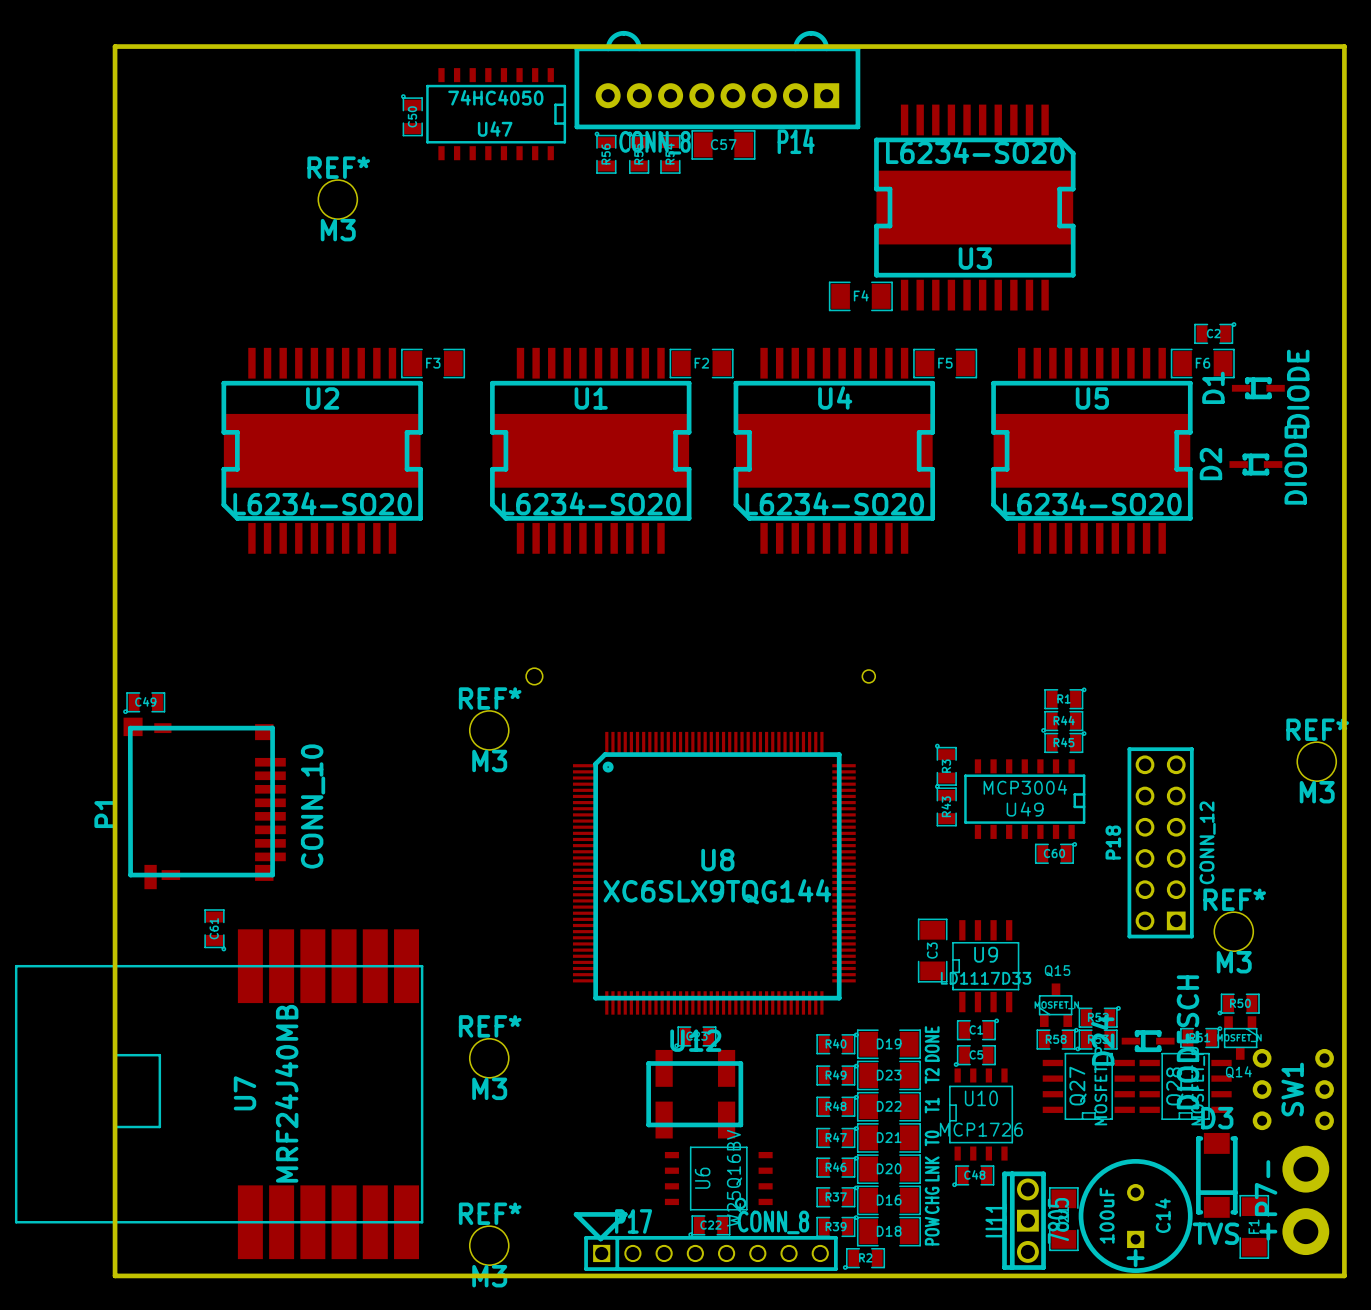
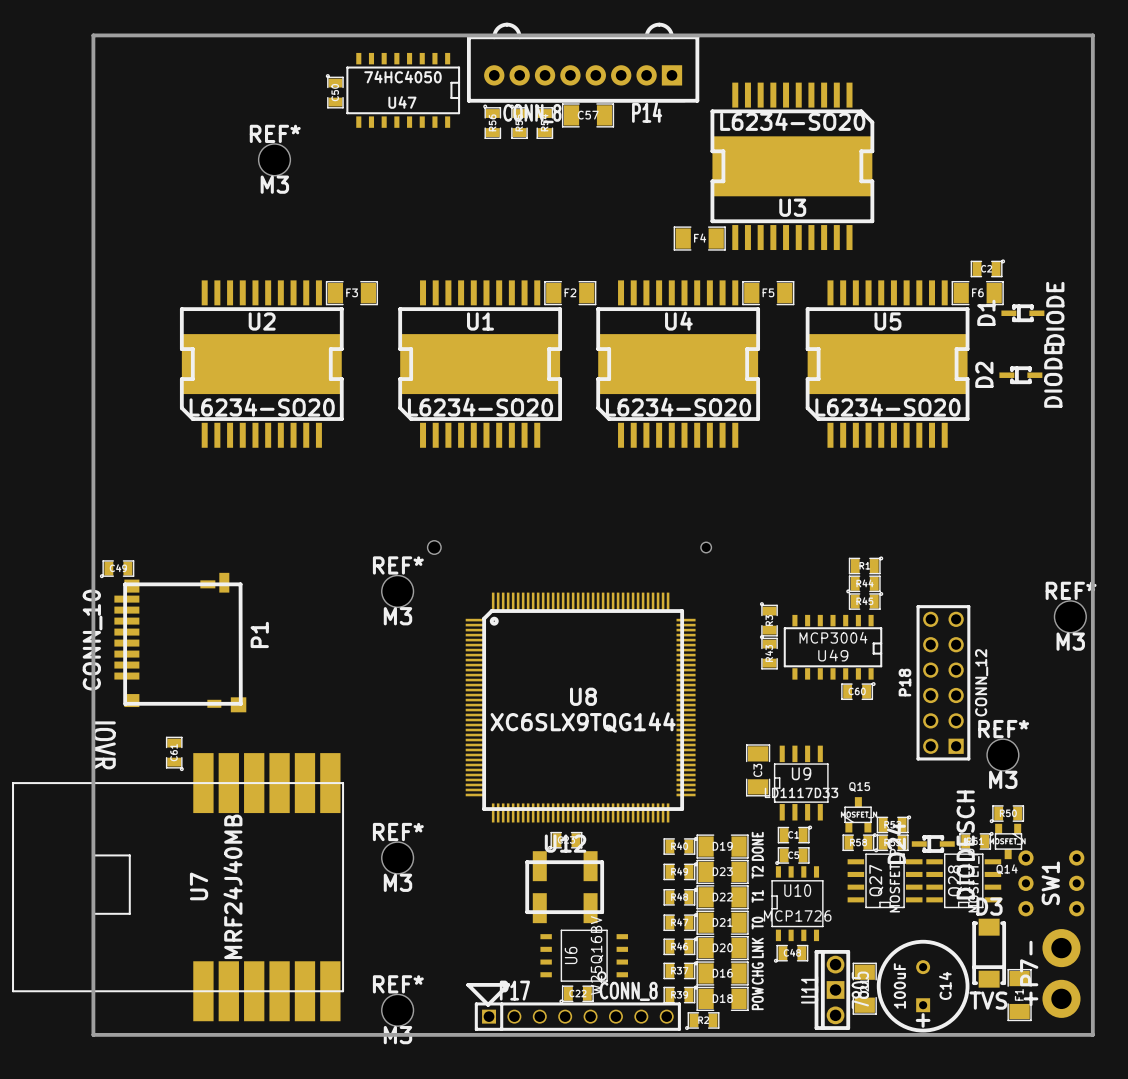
P1 rotation: 0° (204, 803) -> 180° (180, 642)
text: none -> IOVR (104, 745)

